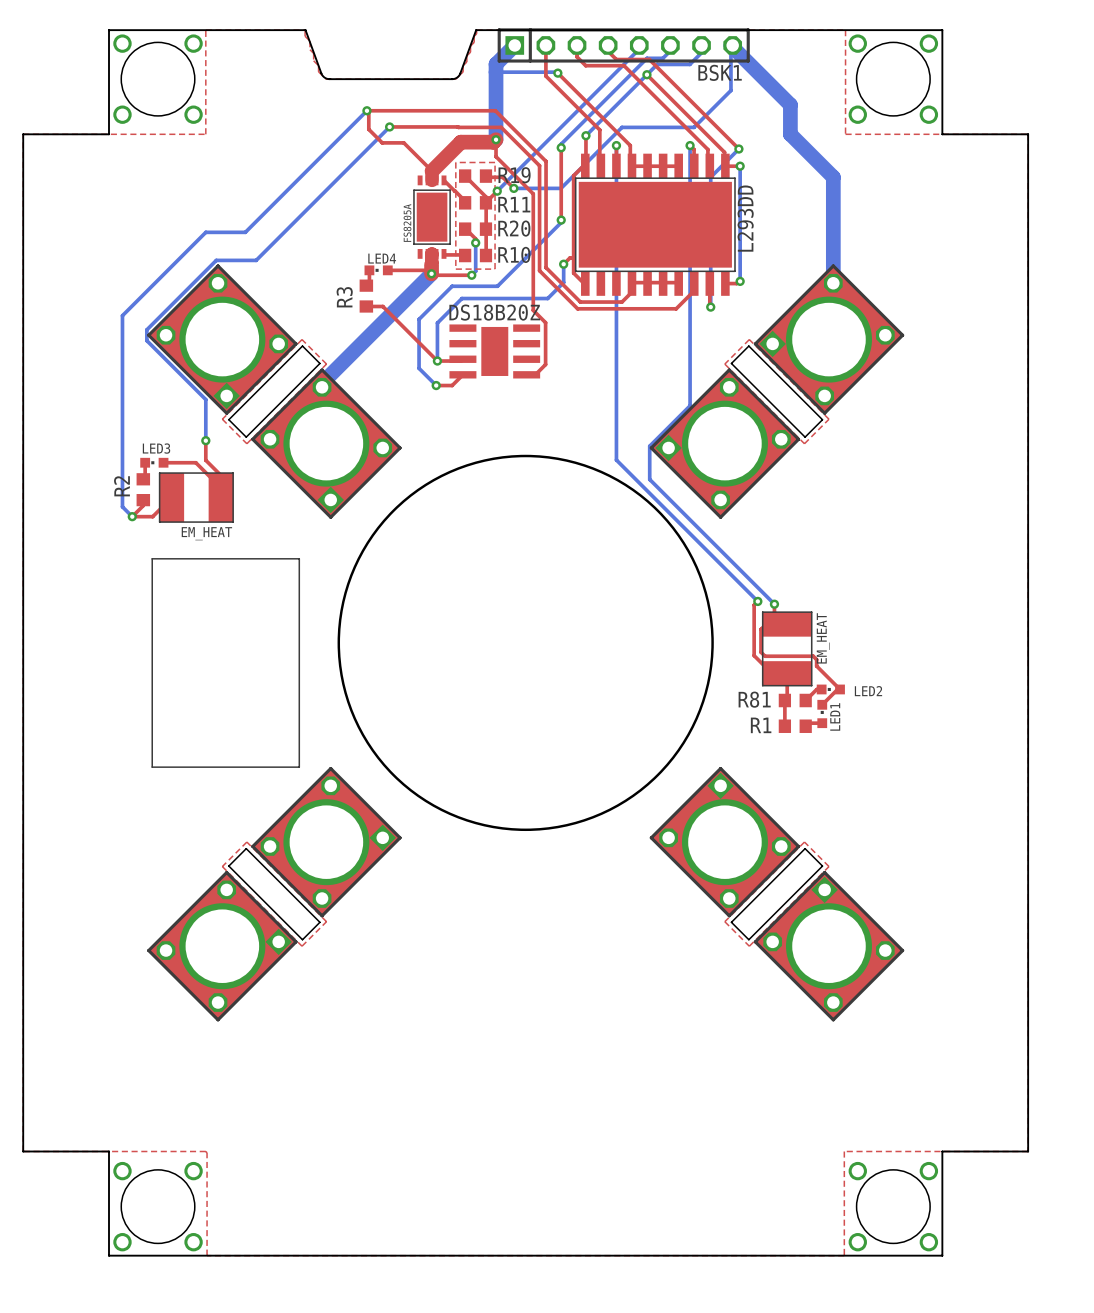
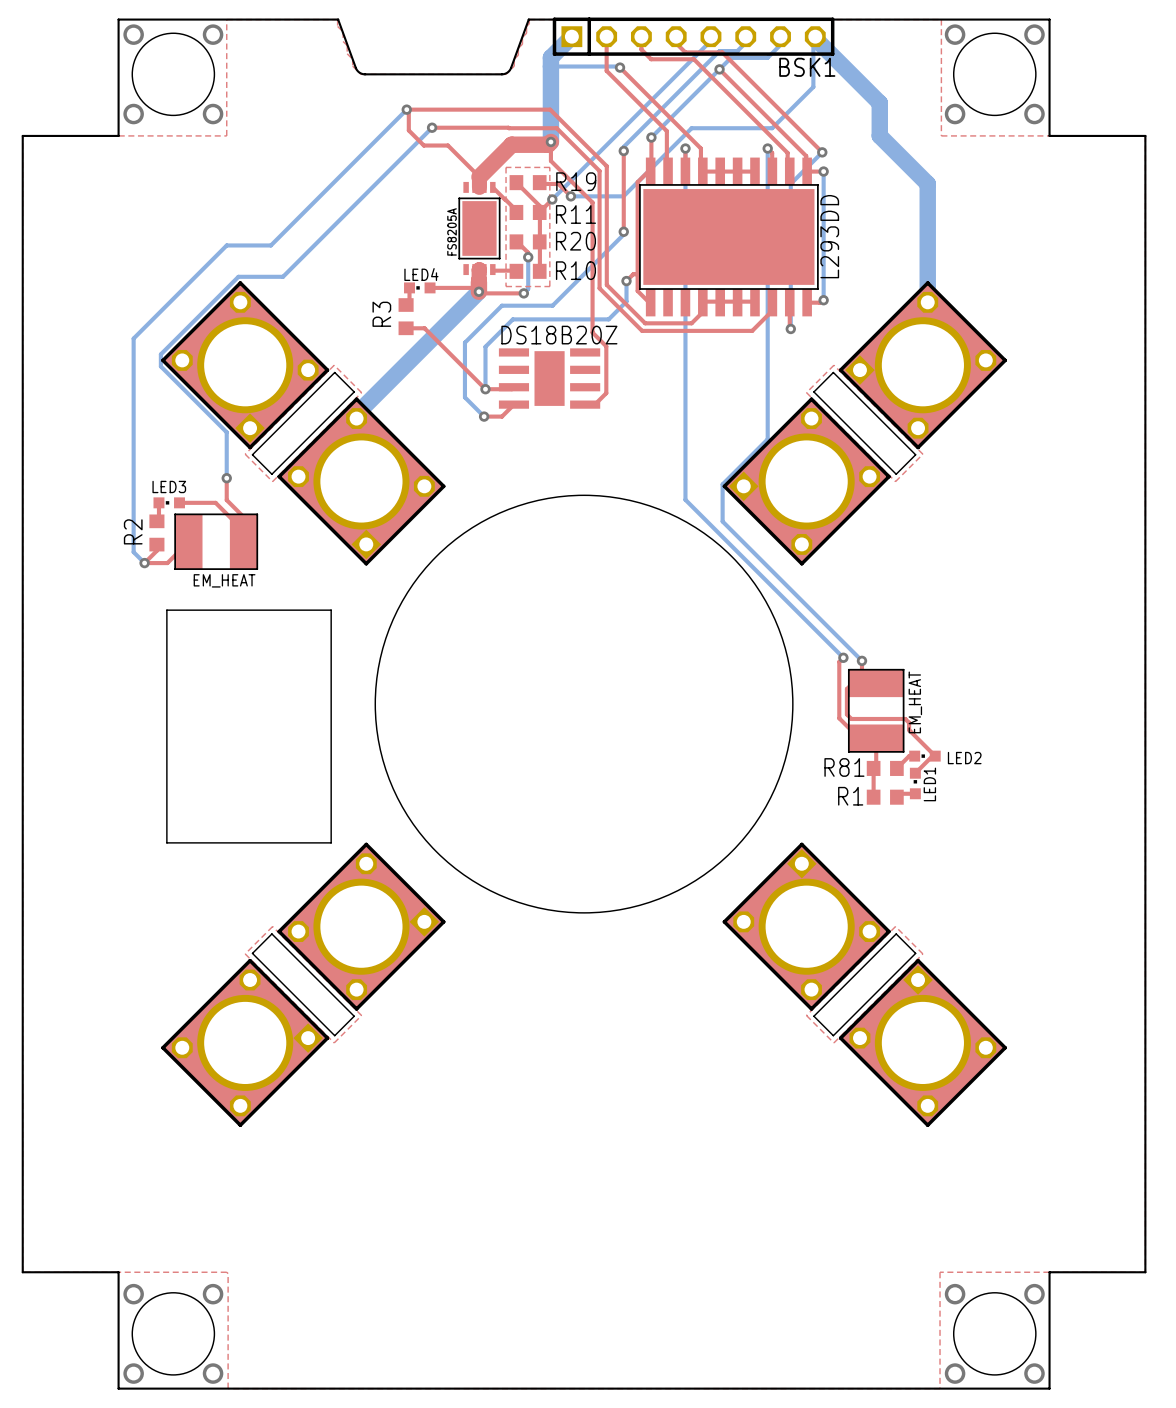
round board edge: [337, 454, 714, 832] -> none

